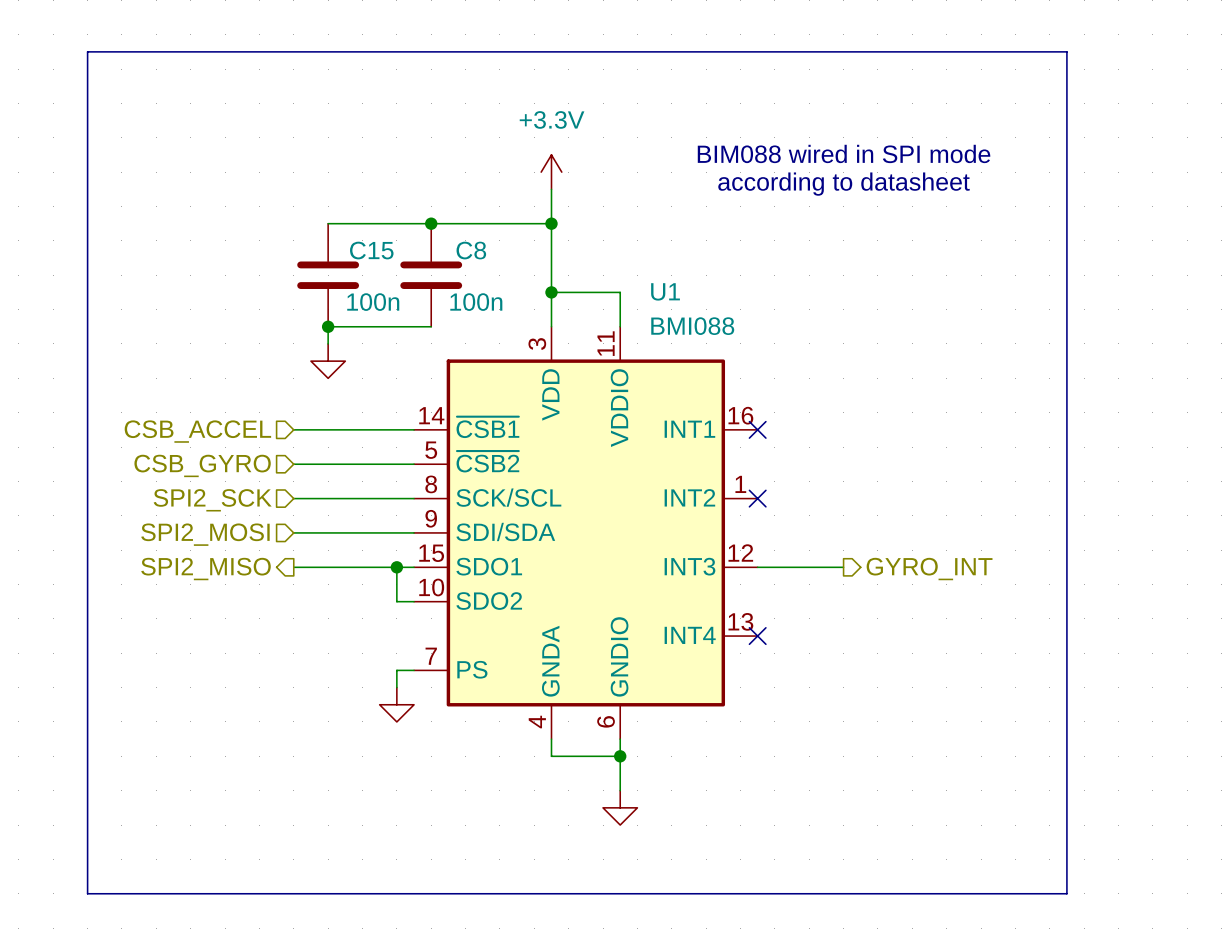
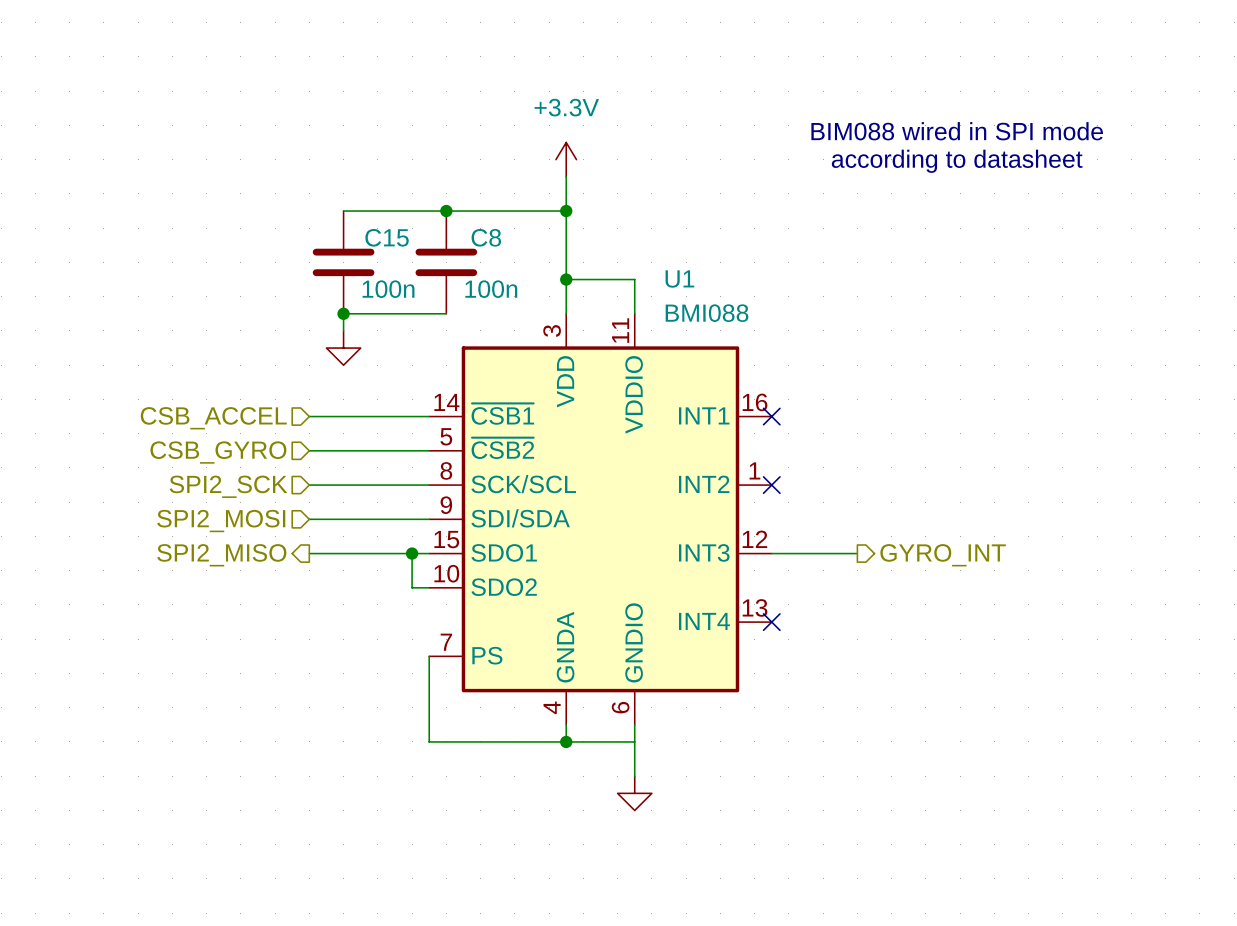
line: (87, 51) (1066, 51) (1066, 893) (87, 893) (87, 51) -> none
text position: BIM088 wired in SPI mode (844, 153) -> BIM088 wired in SPI mode (957, 131)
text position: according to datasheet (844, 184) -> according to datasheet (957, 161)
wire: (414, 670) (396, 670) (396, 687) -> (429, 656) (429, 741) (566, 741)
power symbol: (396, 704) -> none
junction position: (620, 756) -> (566, 741)

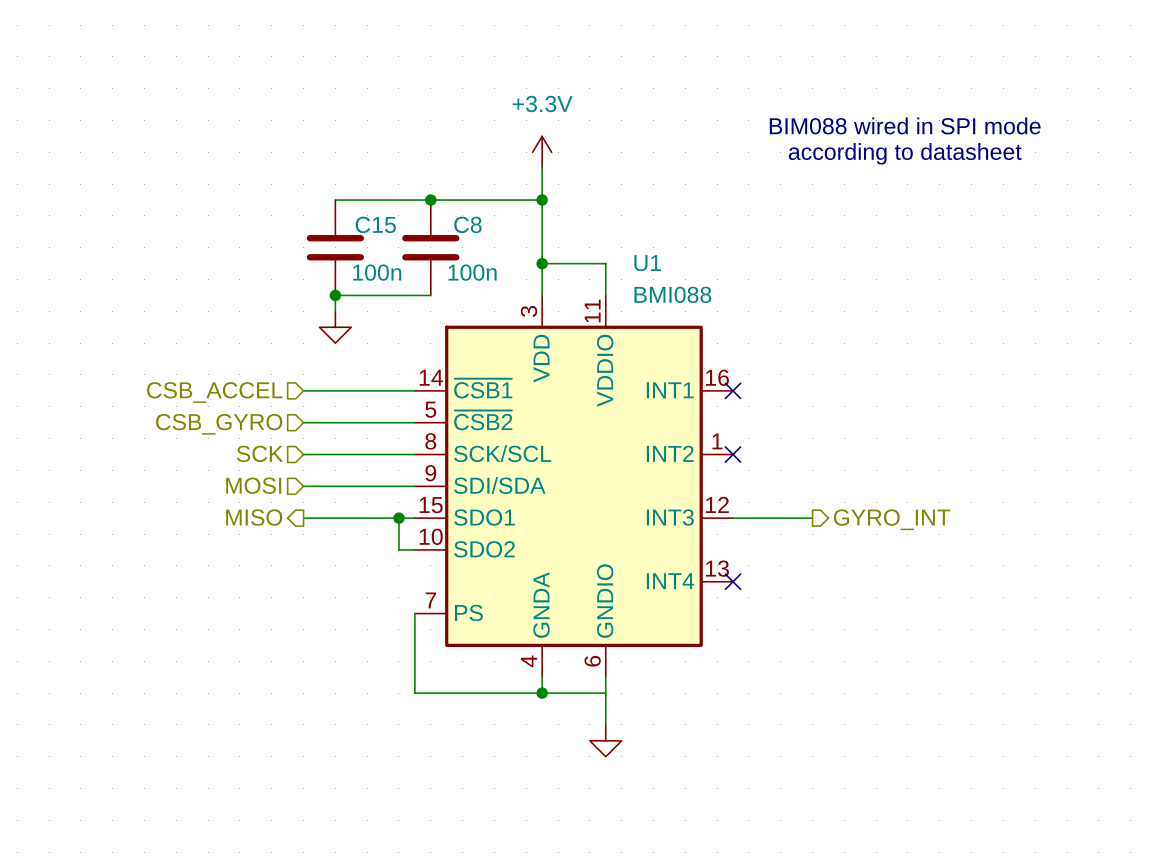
hierarchical label: SPI2_SCK (228, 486) -> SCK (259, 453)
hierarchical label: SPI2_MOSI (221, 521) -> MOSI (253, 485)
hierarchical label: SPI2_MISO (221, 555) -> MISO (254, 517)

